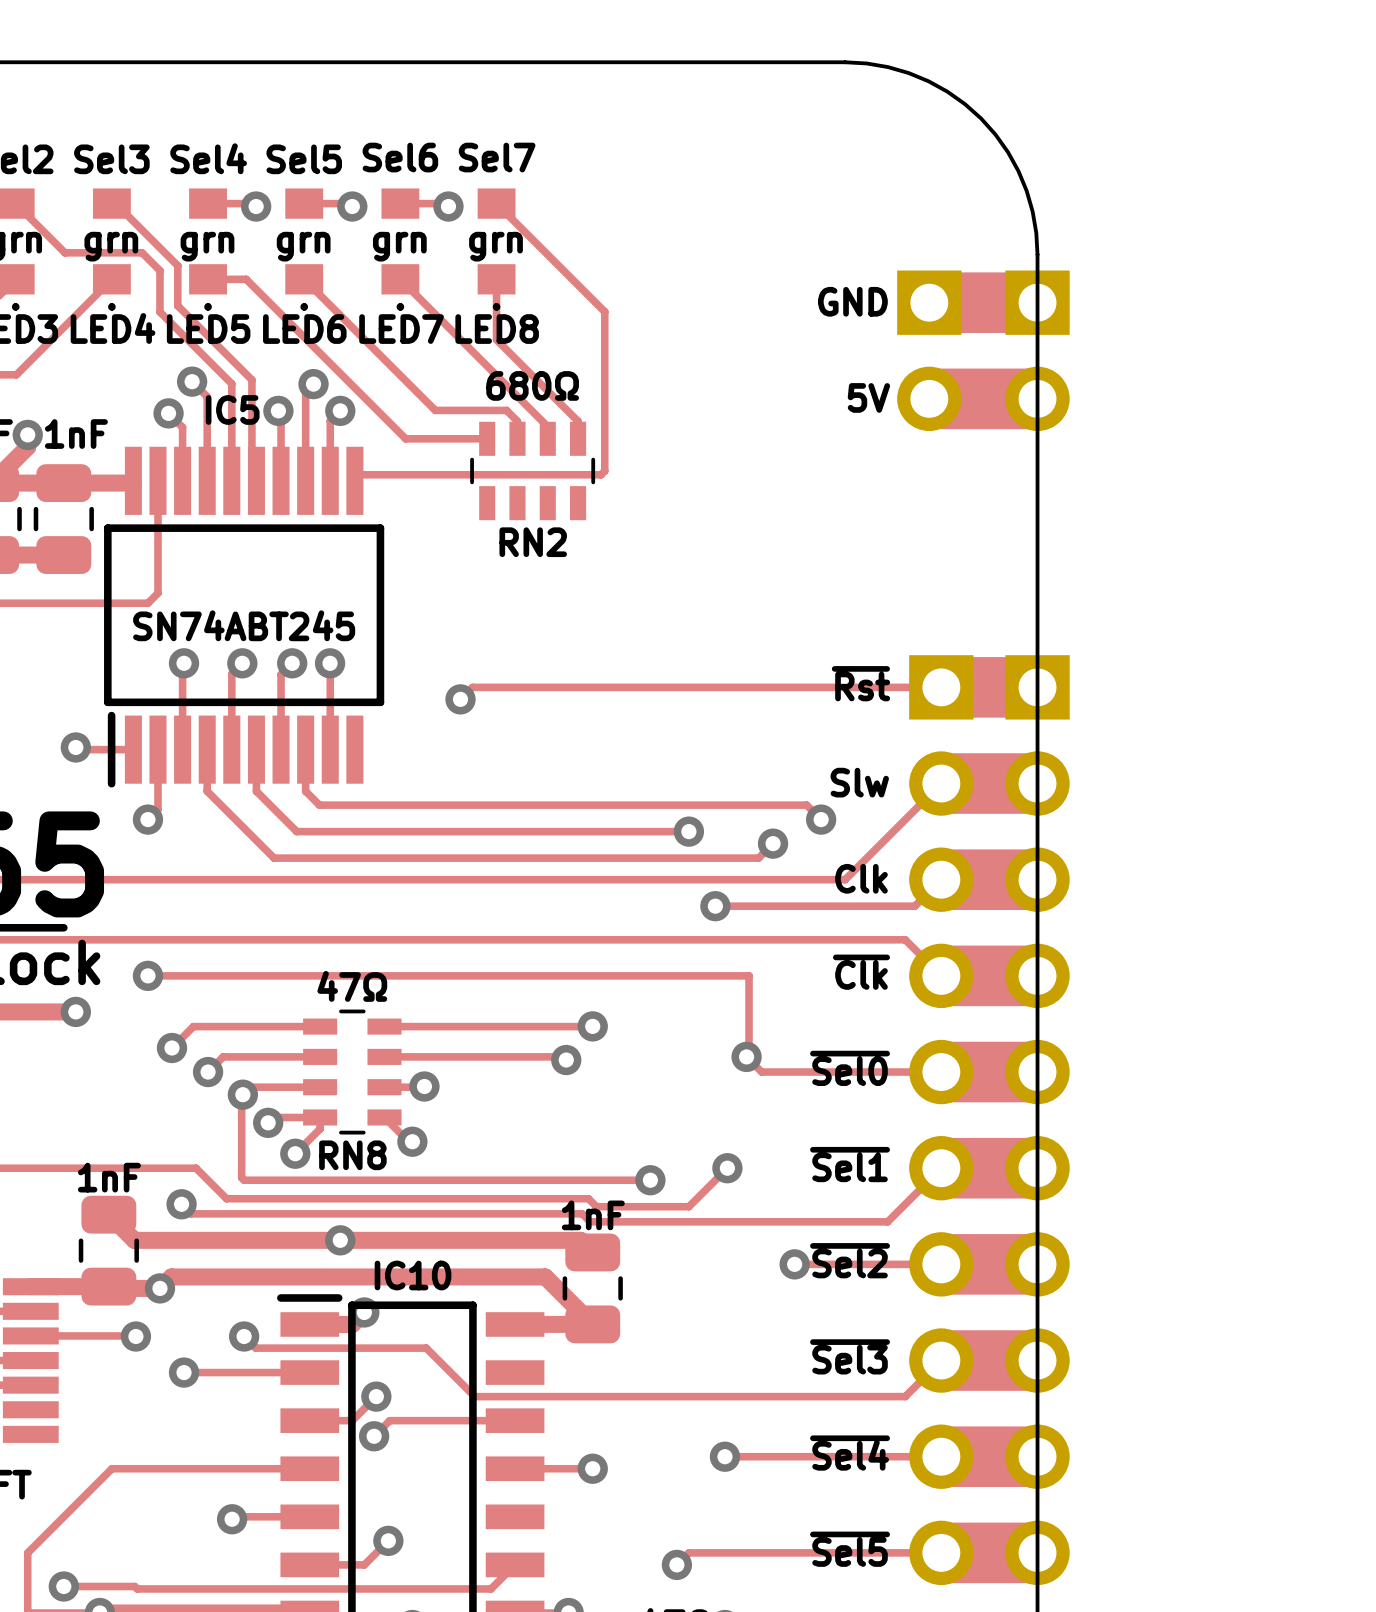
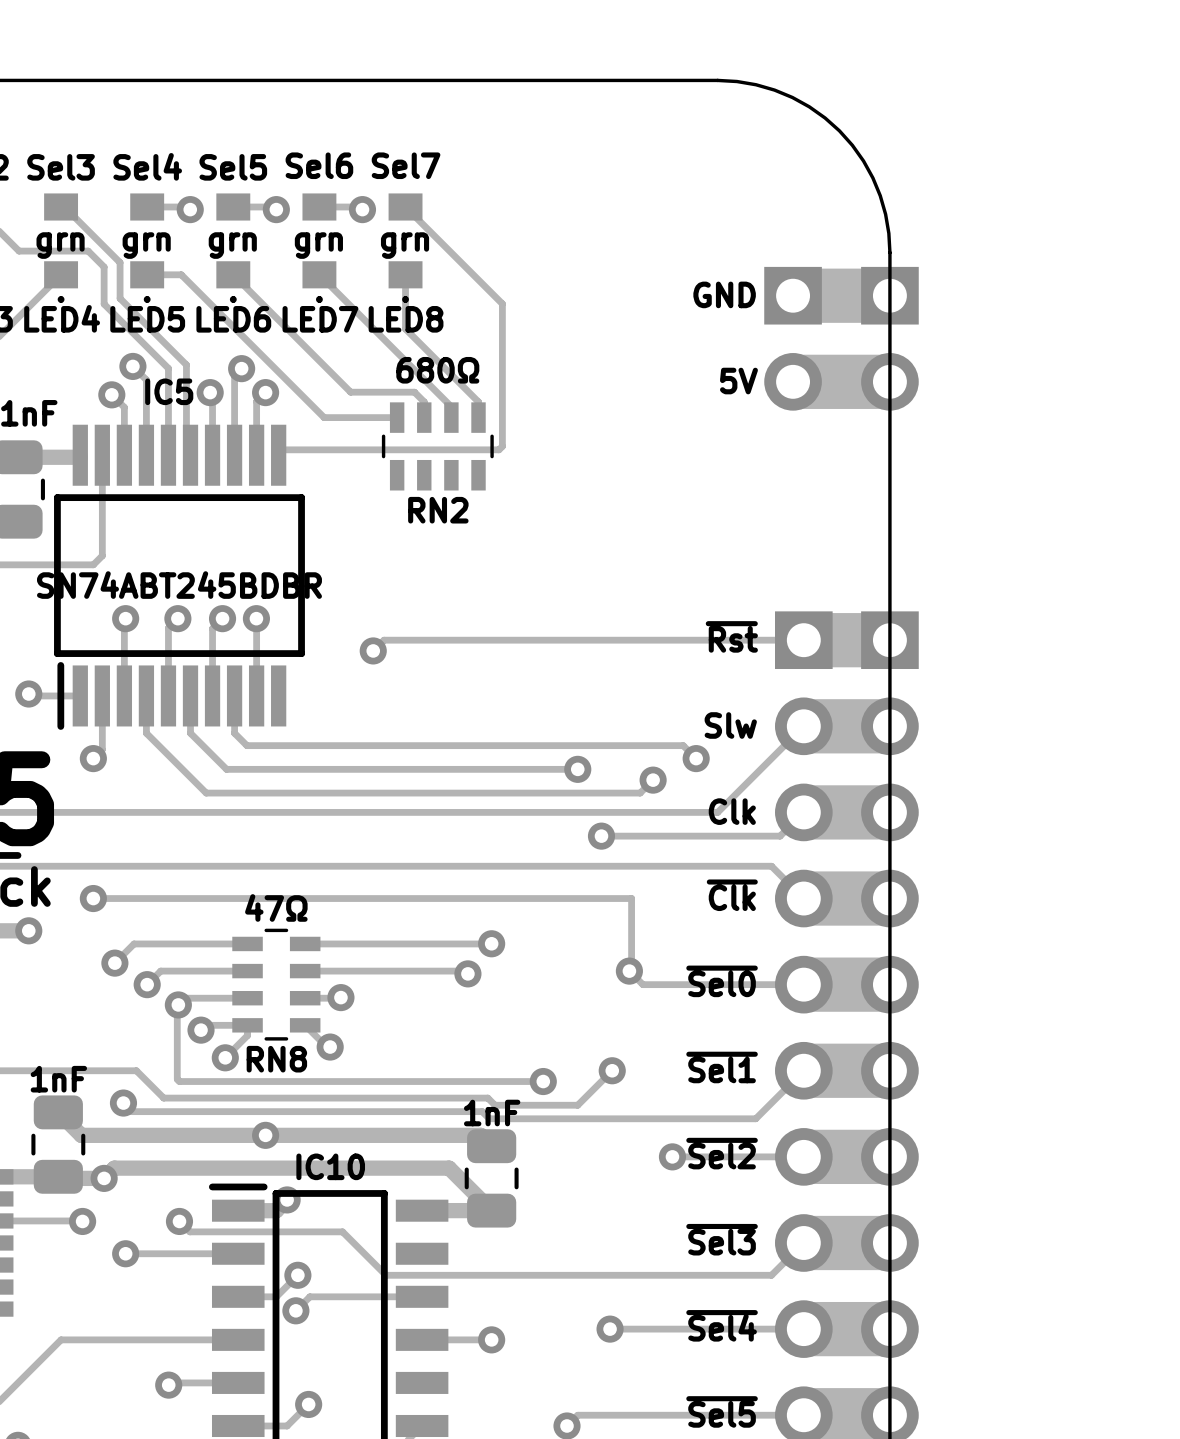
IC5 value: SN74ABT245 (244, 625) -> SN74ABT245BDBR (179, 585)

